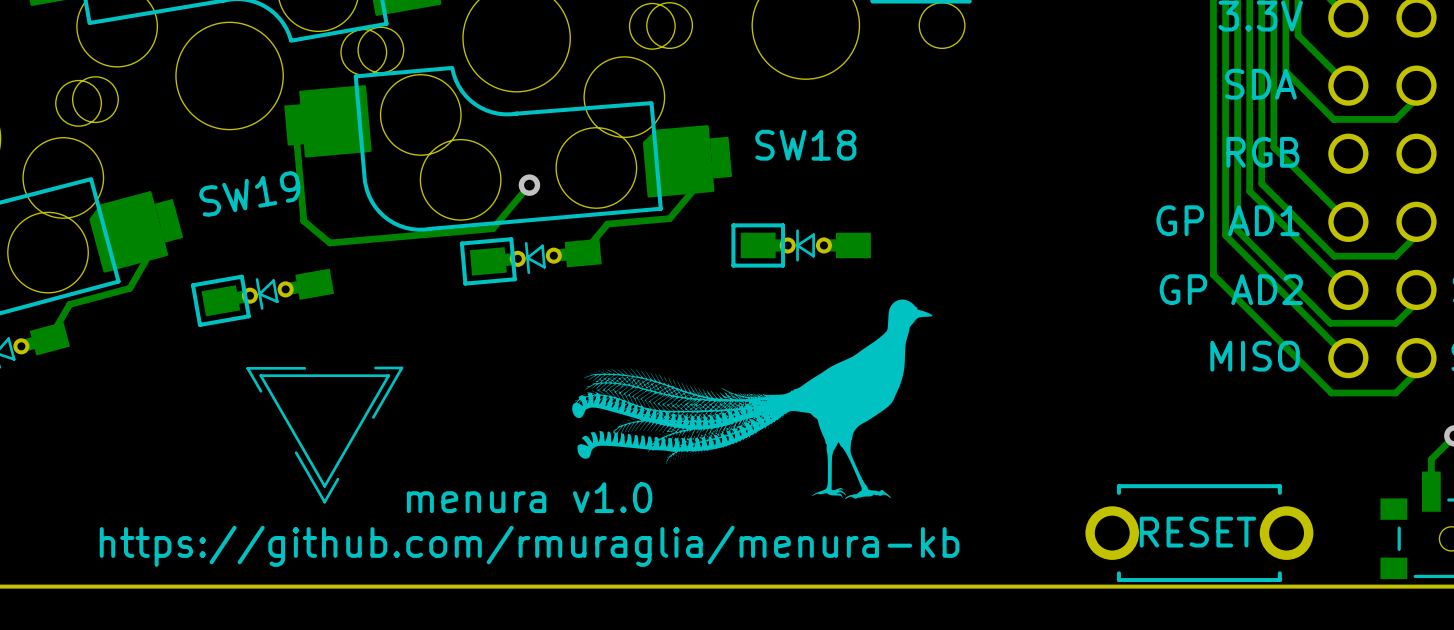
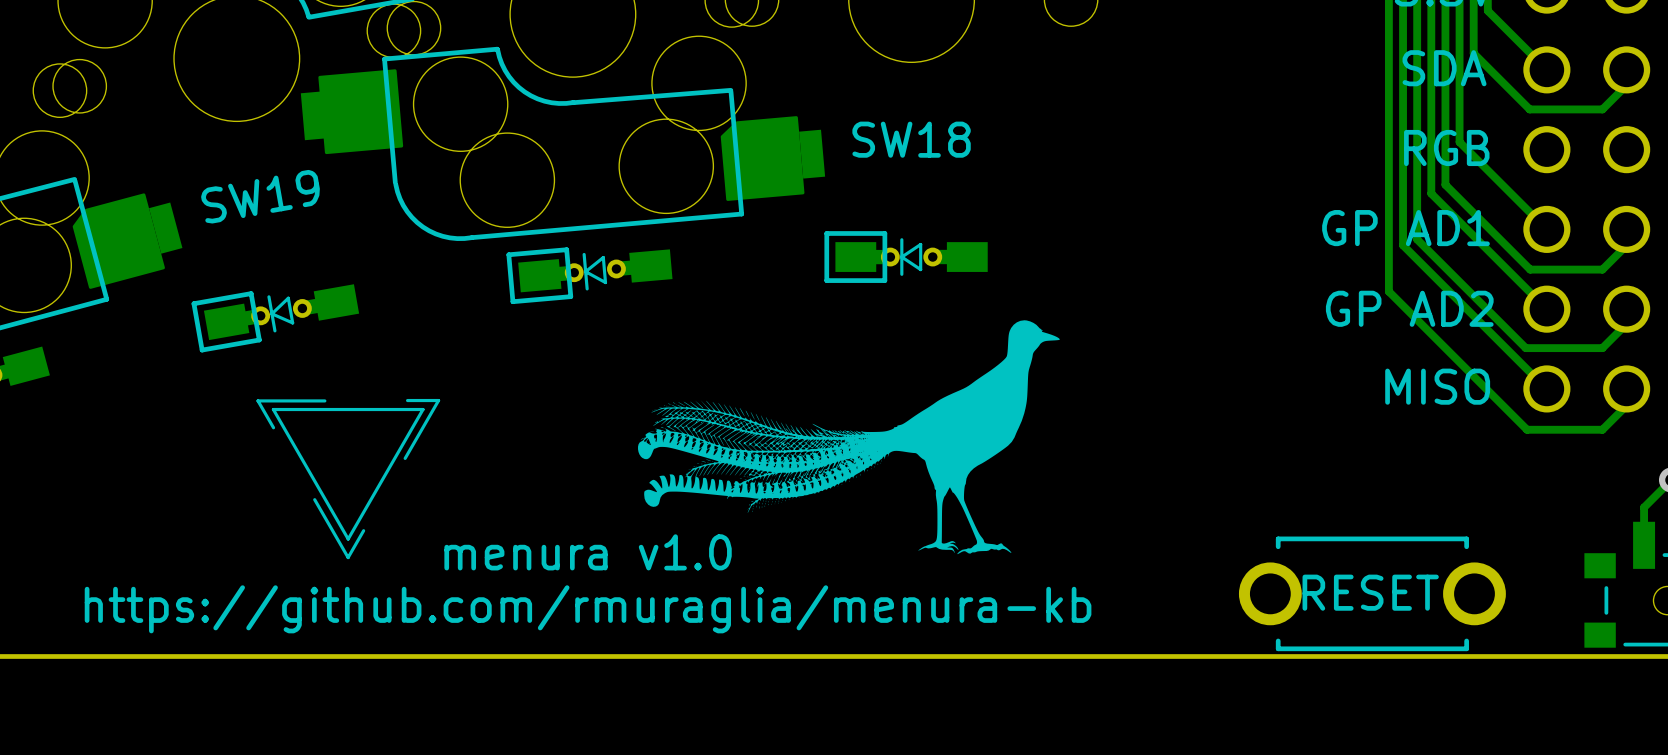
track: (295, 124) (303, 221) (329, 242) (492, 228) (529, 185) -> none
track: (720, 157) (669, 218) (607, 224) (583, 253) -> none
via: (529, 185) -> none
track: (168, 220) (129, 288) (69, 304) (49, 338) -> none

